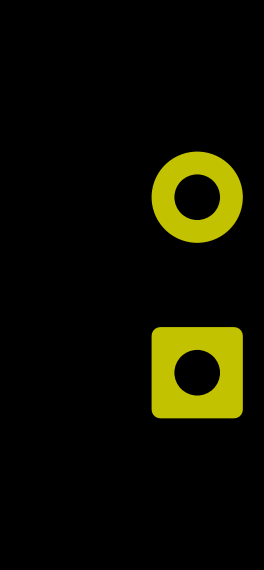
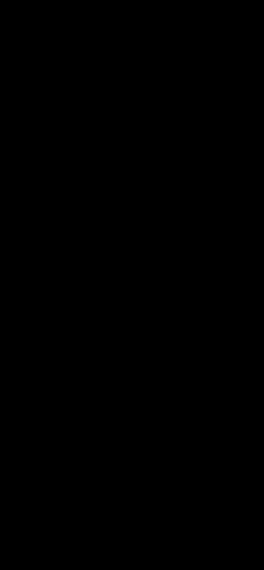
part: (197, 284) -> none

